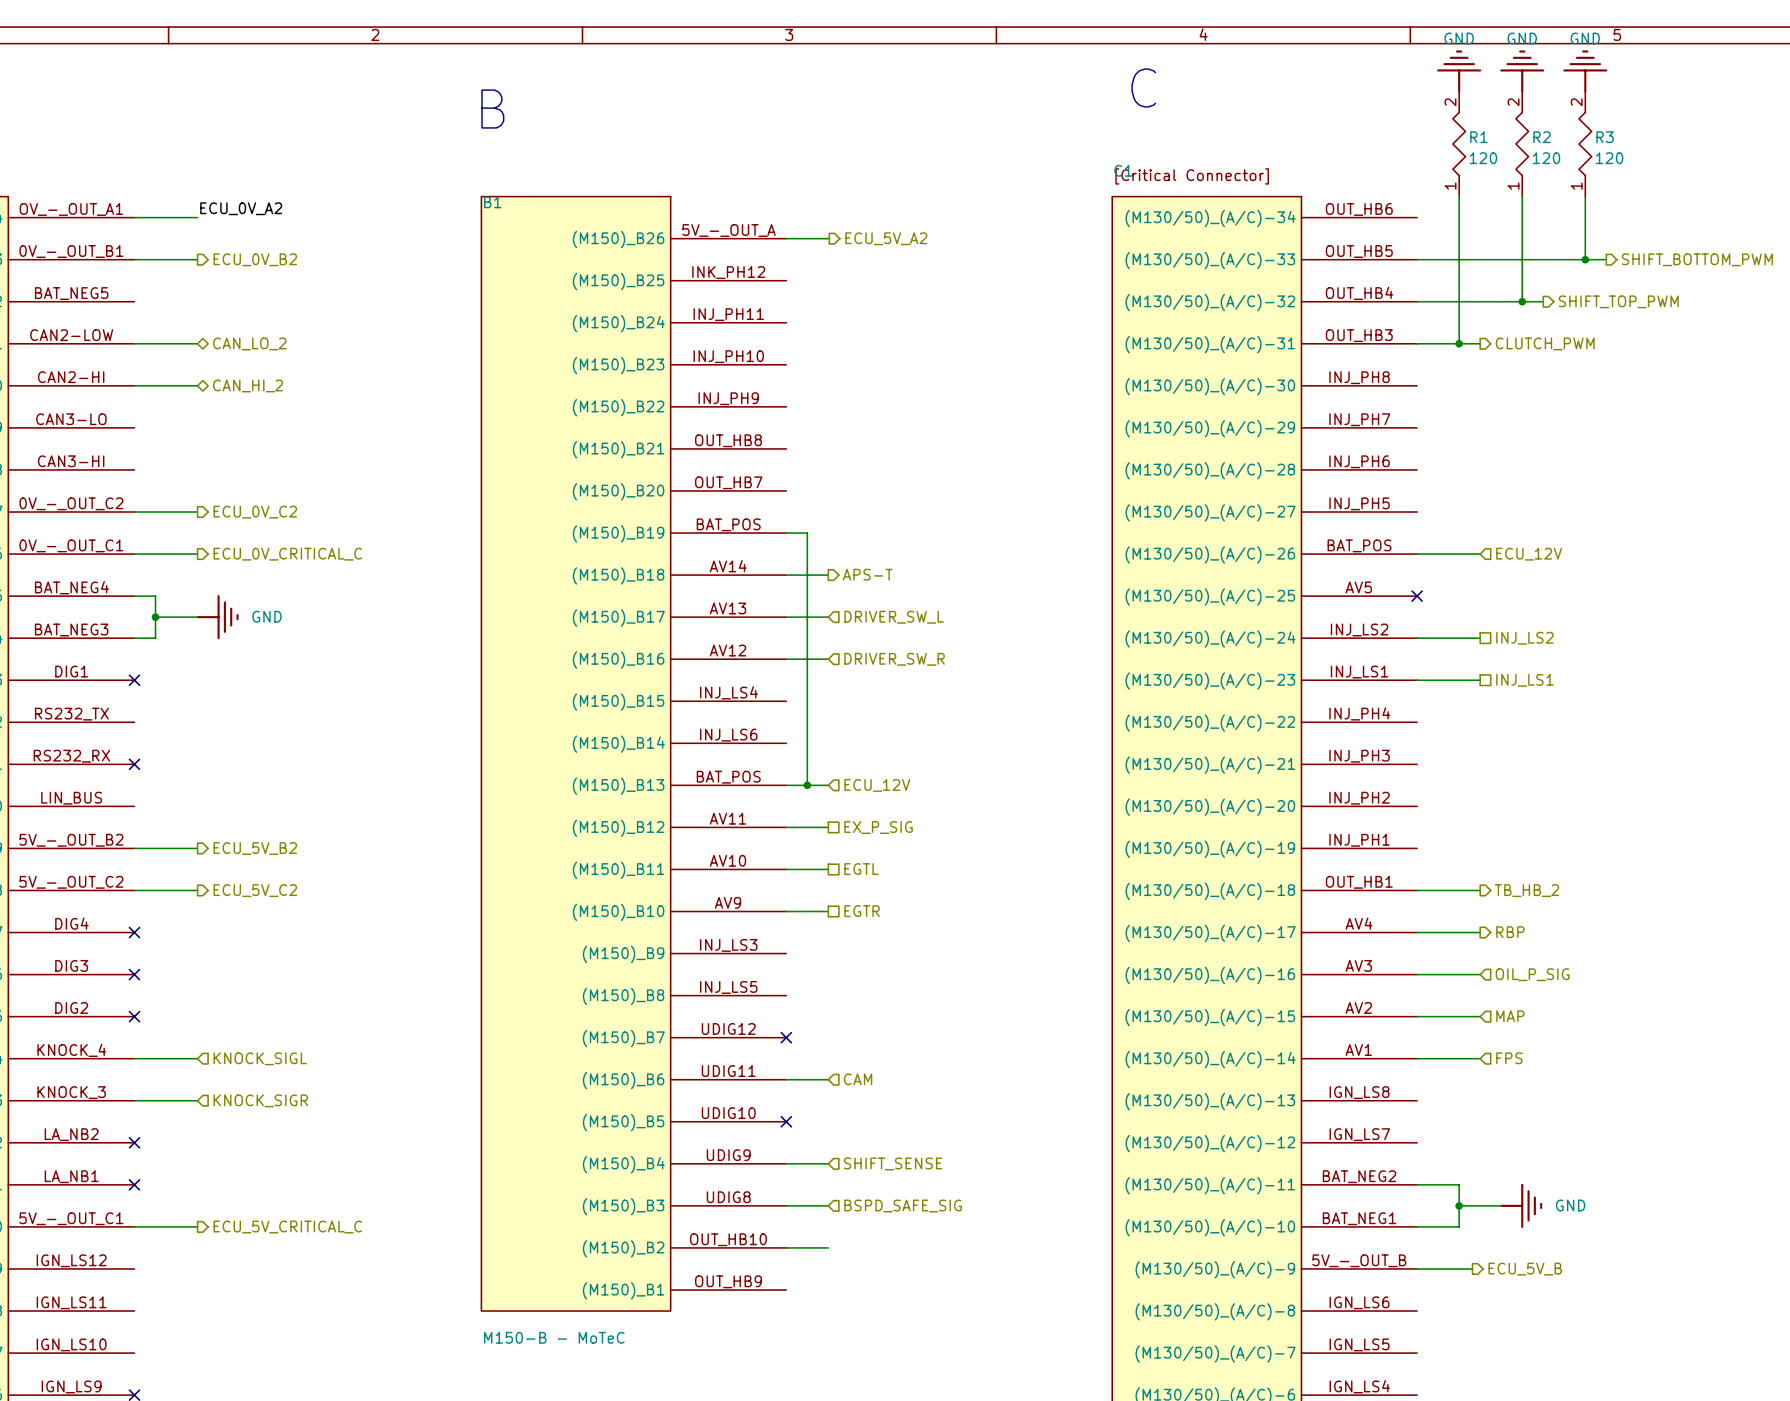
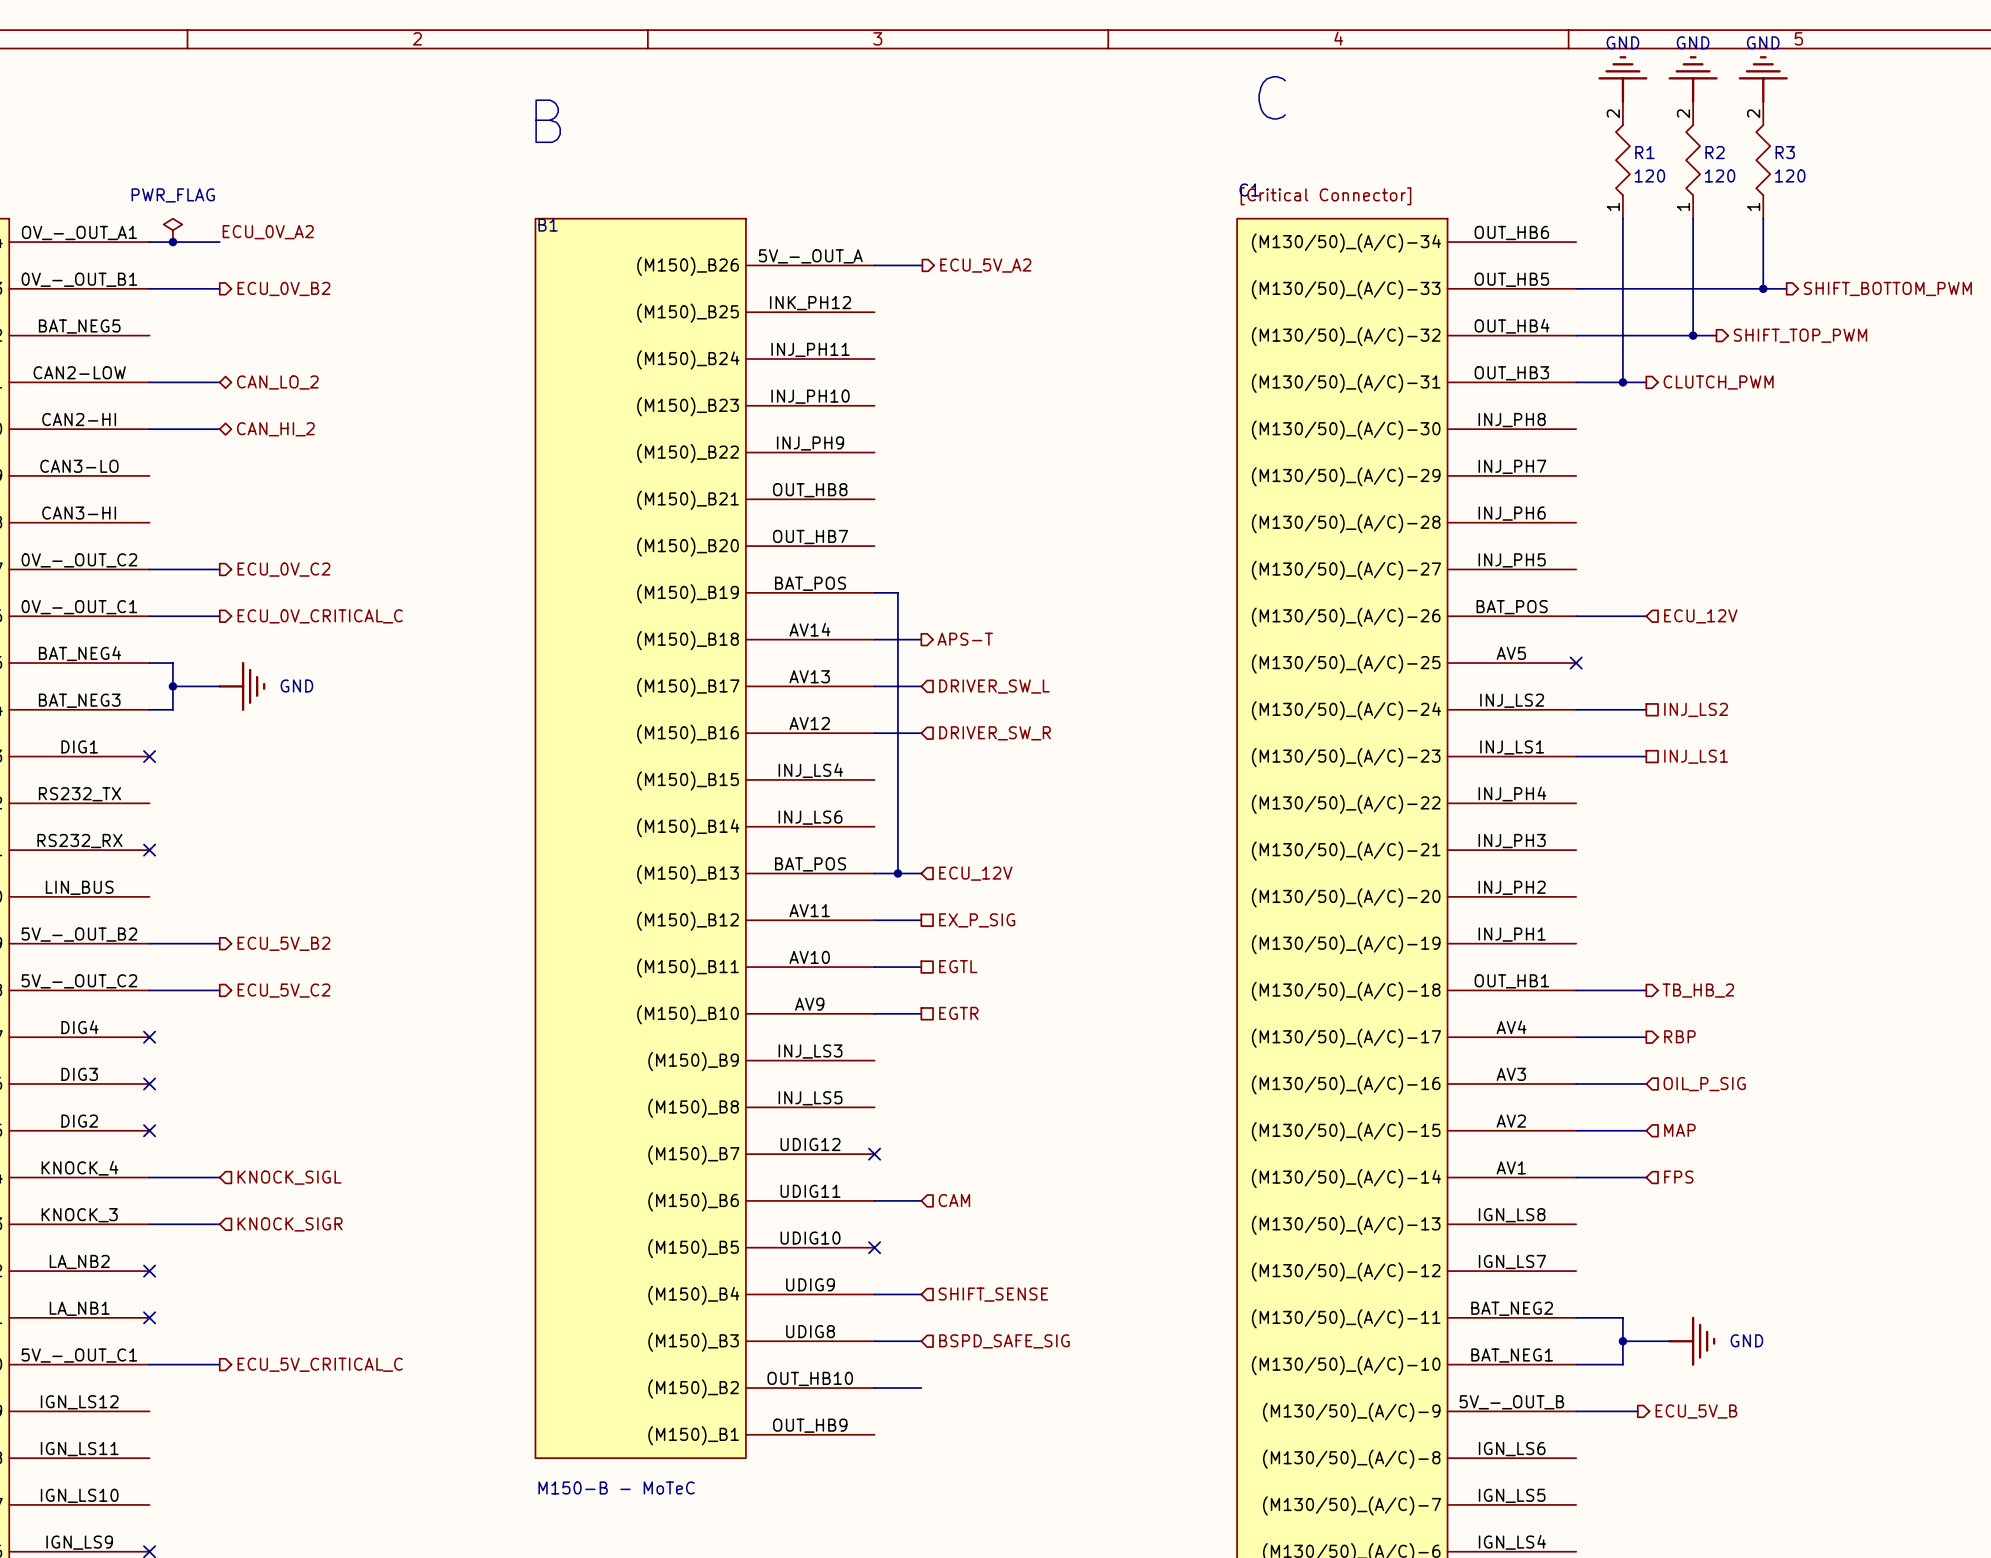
power symbol: none -> PWR_FLAG (172, 230)
junction: none -> (172, 242)

